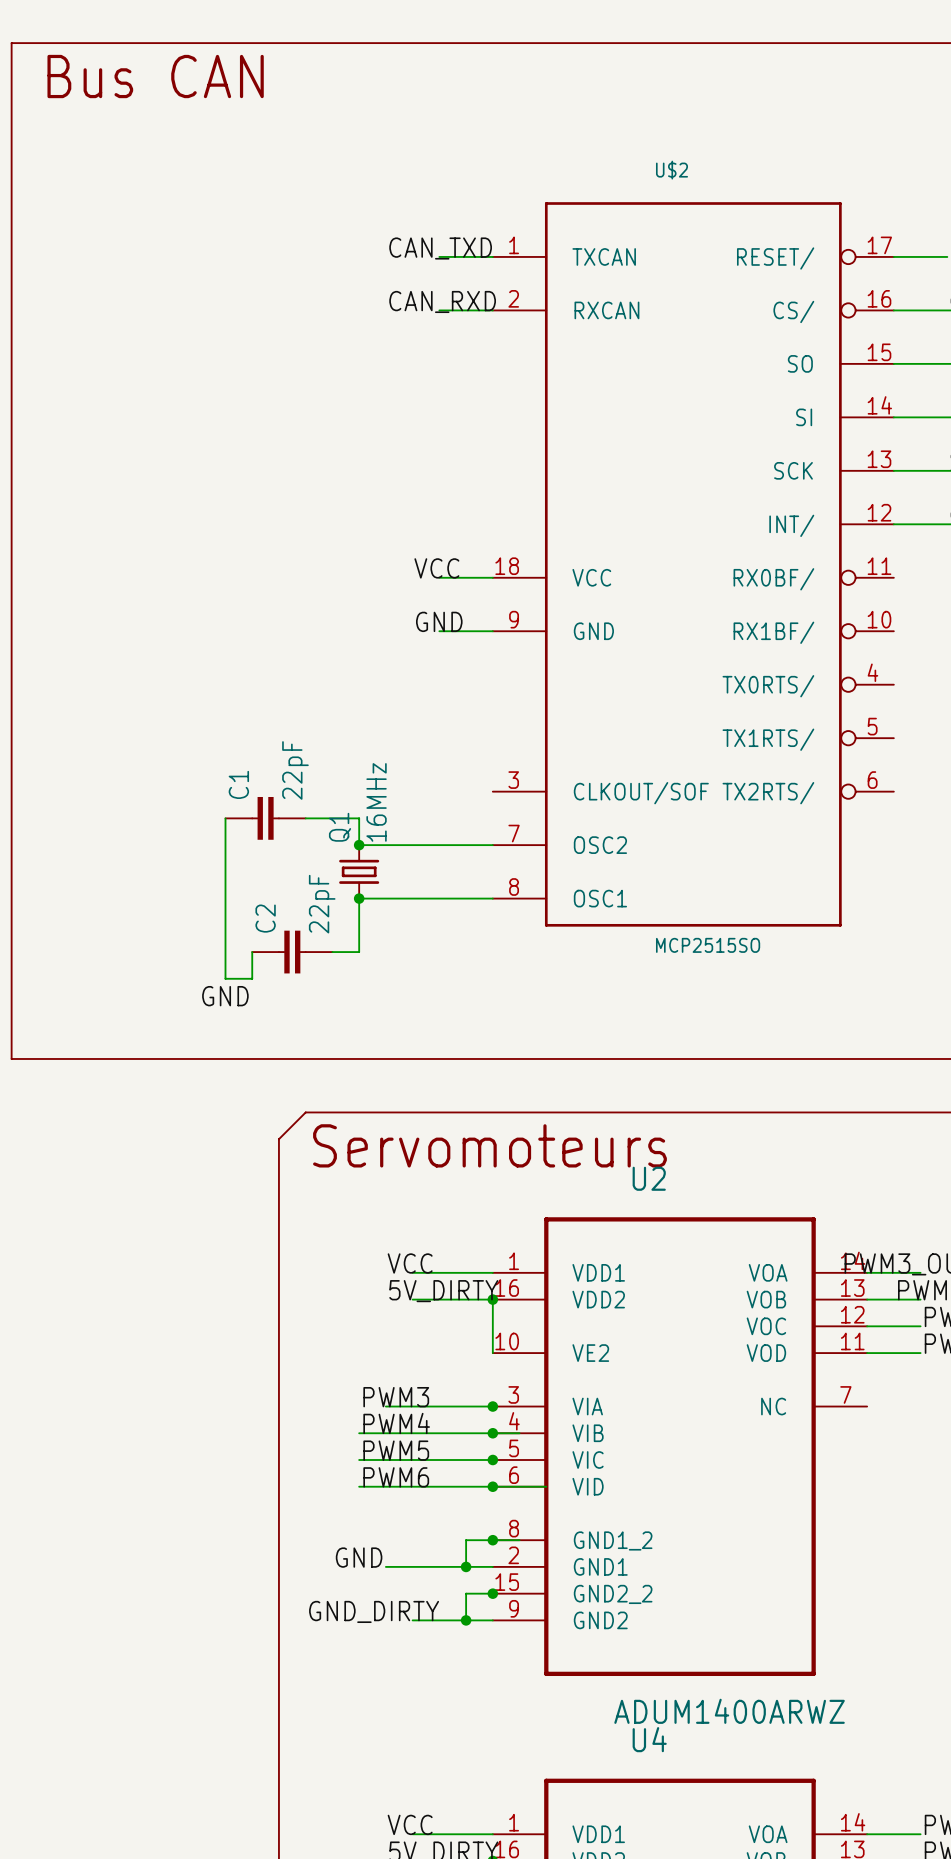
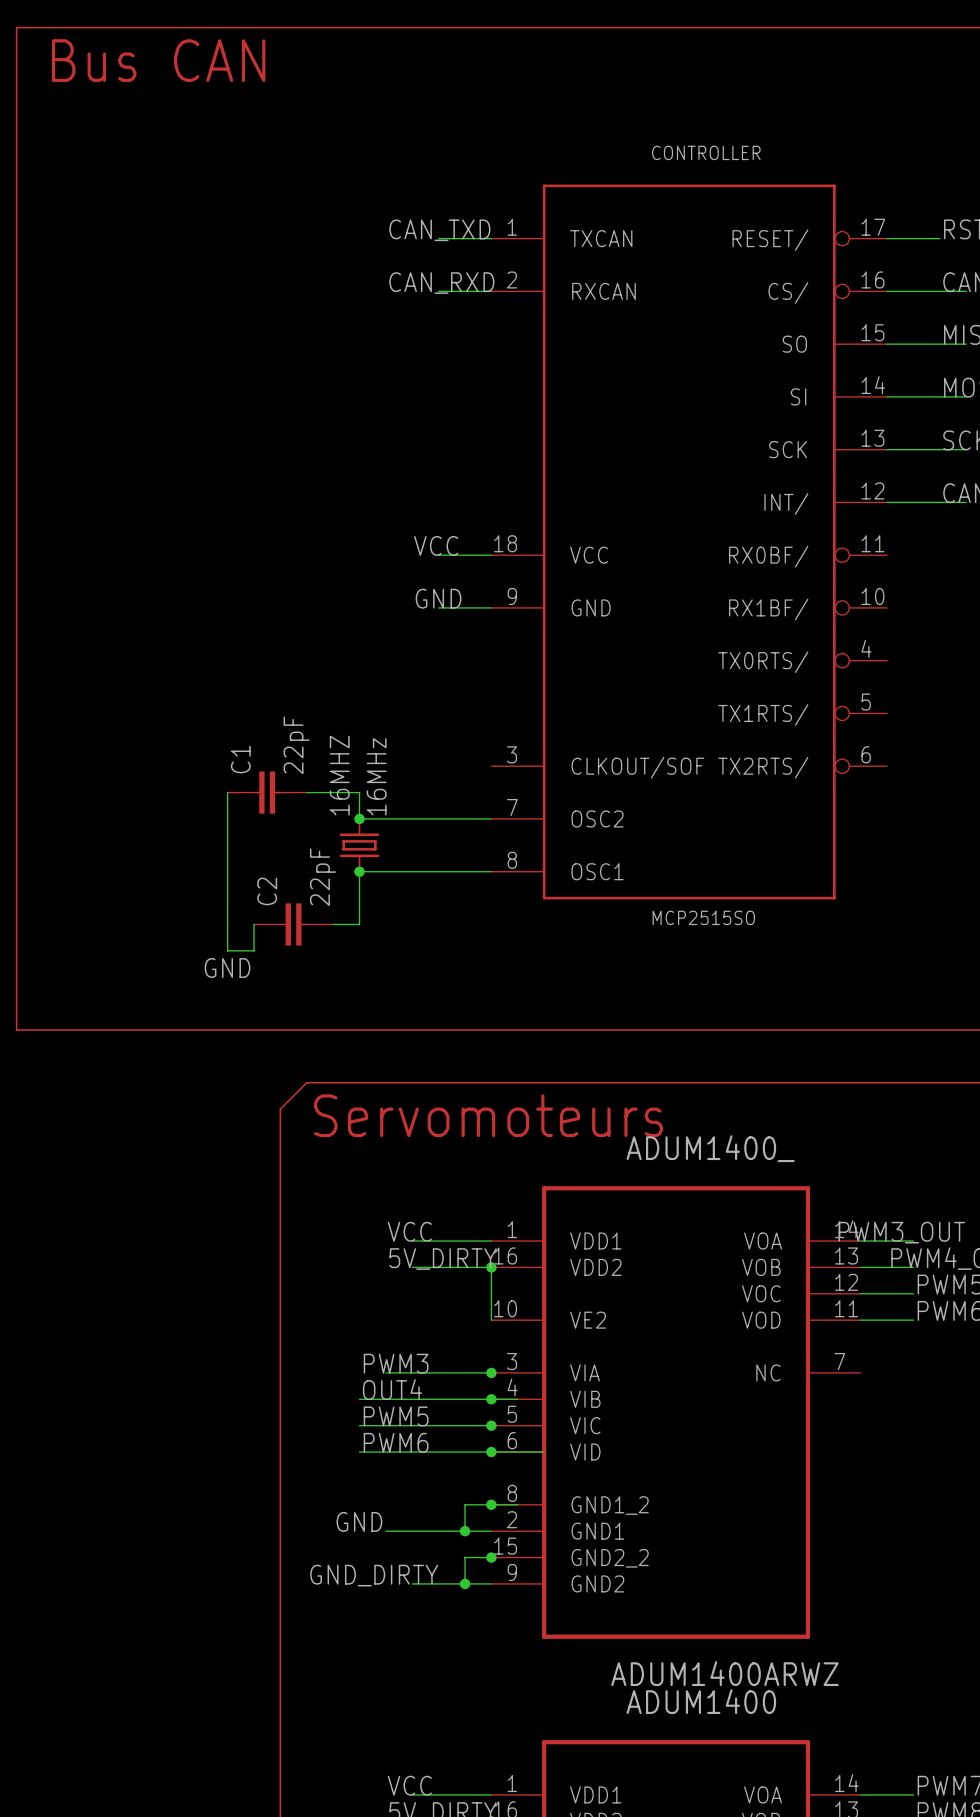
U$2 name: U$2 (671, 170) -> CONTROLLER (706, 152)
Q1 name: Q1 (340, 827) -> 16MHZ (339, 775)
U2 name: U2 (649, 1178) -> ADUM1400_ (710, 1148)
label: PWM4 (396, 1423) -> OUT4 (392, 1389)
U4 name: U4 (649, 1739) -> ADUM1400 (701, 1701)

